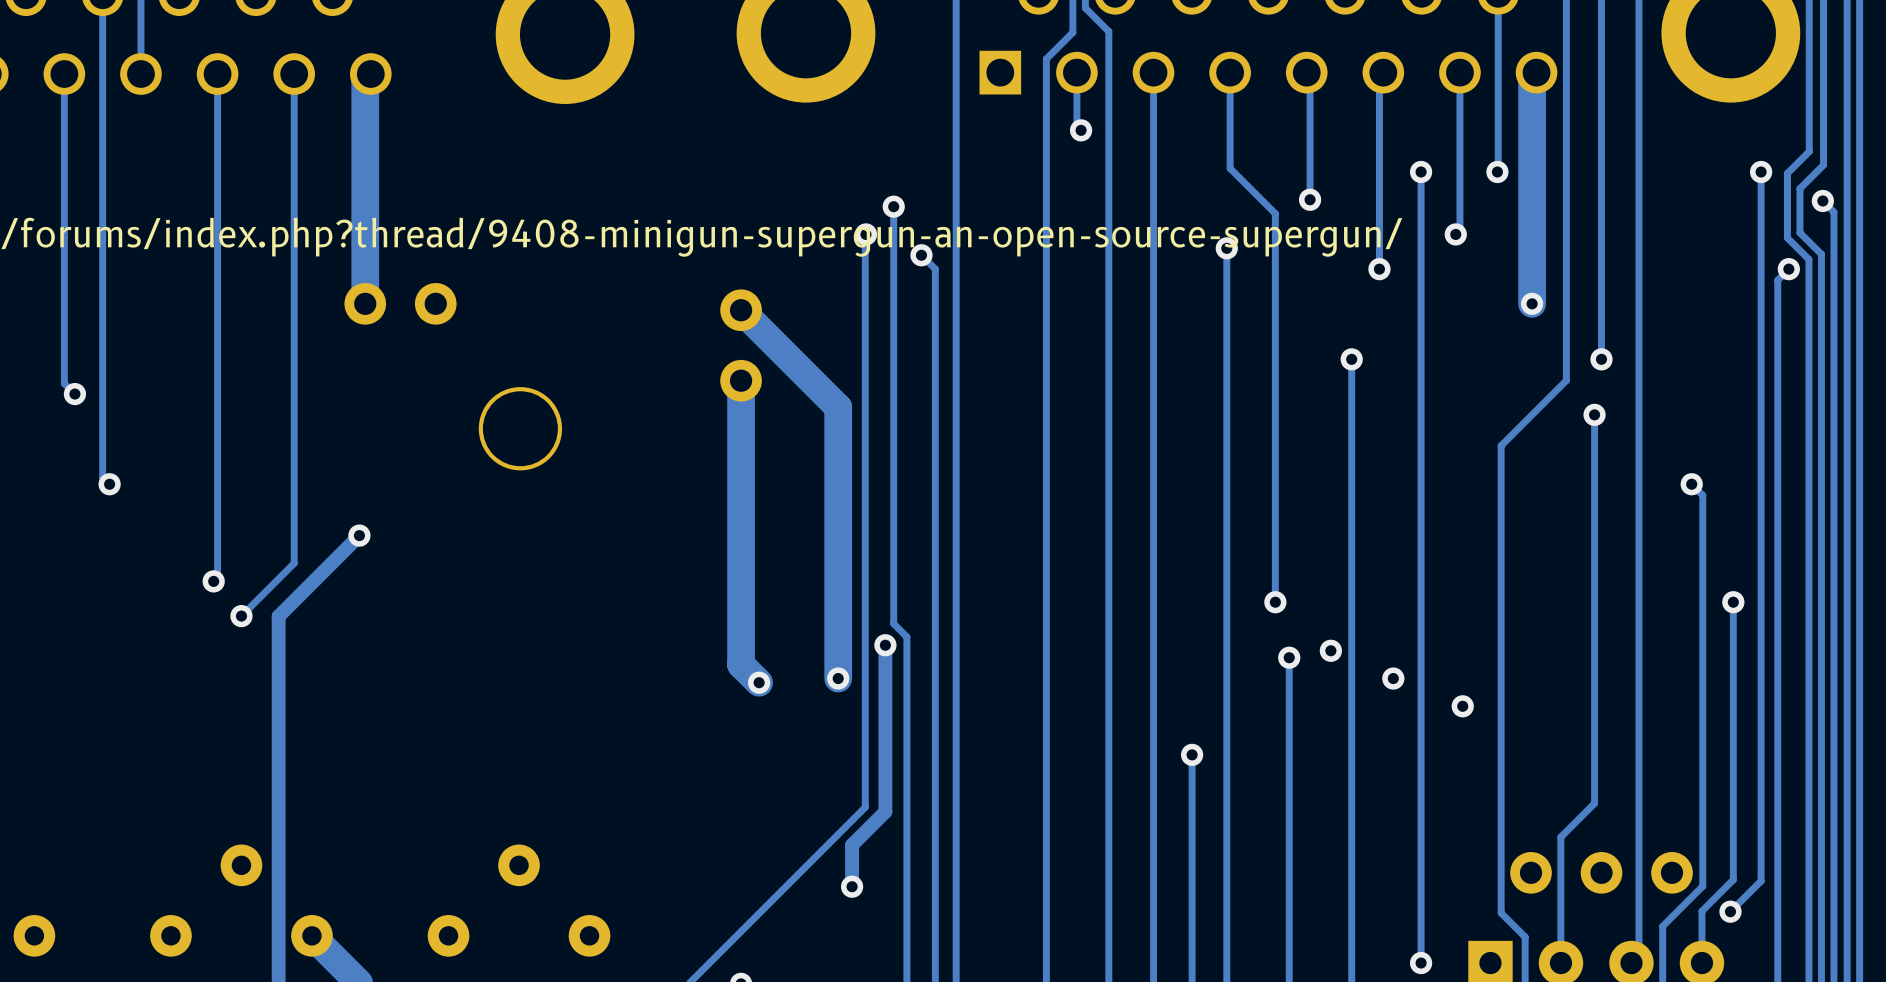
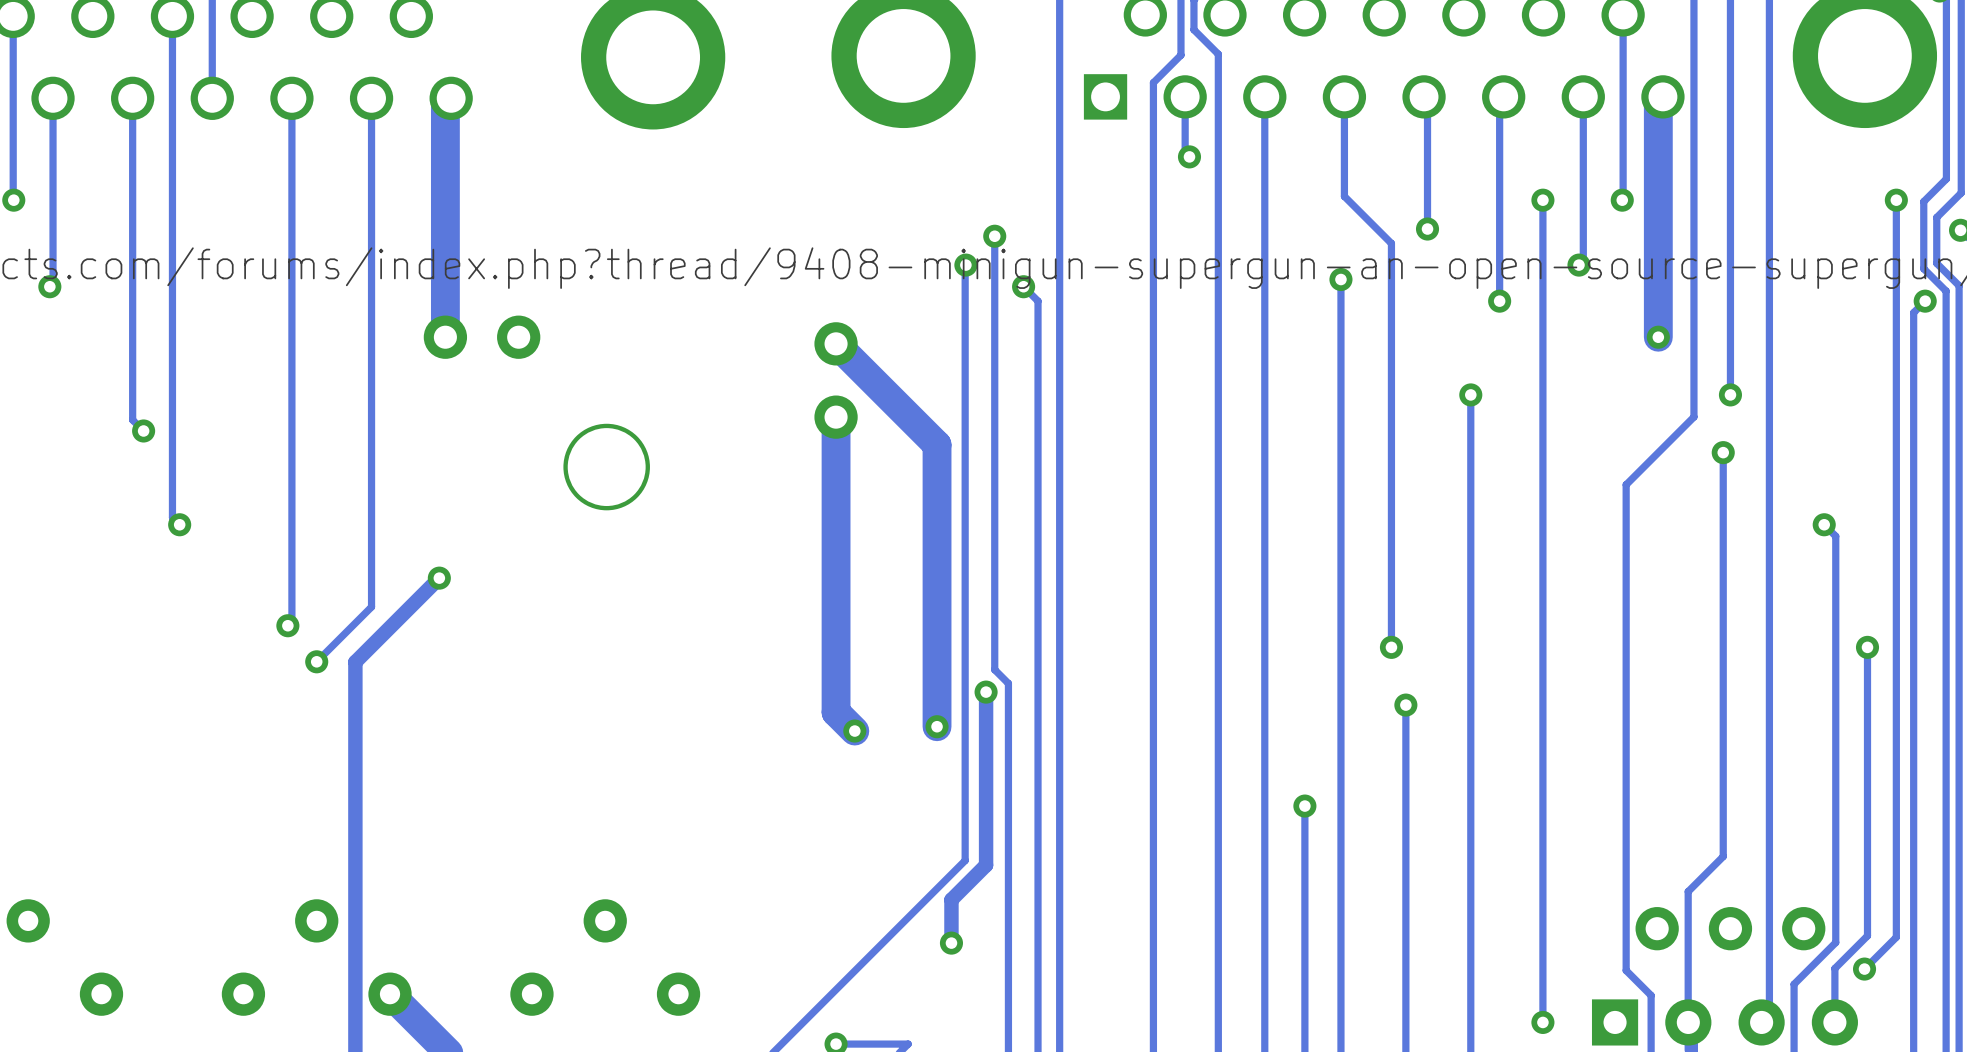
via: (1330, 650) -> none
via: (1393, 678) -> none
via: (1462, 706) -> none

